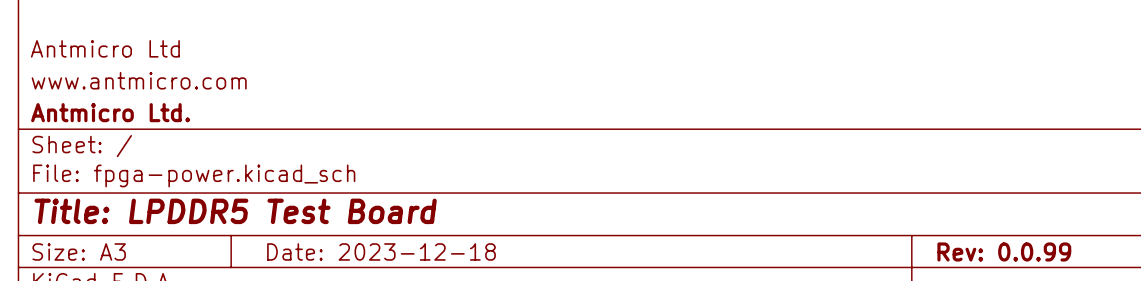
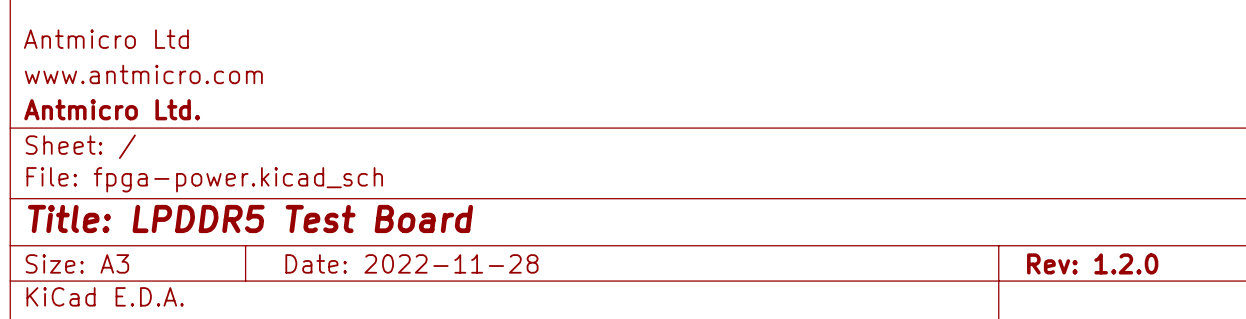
title block: Date: 2023-12-18 (381, 251) -> Date: 2022-11-28 (411, 263)
title block: Rev: 0.0.99 (1004, 251) -> Rev: 1.2.0 (1092, 263)

